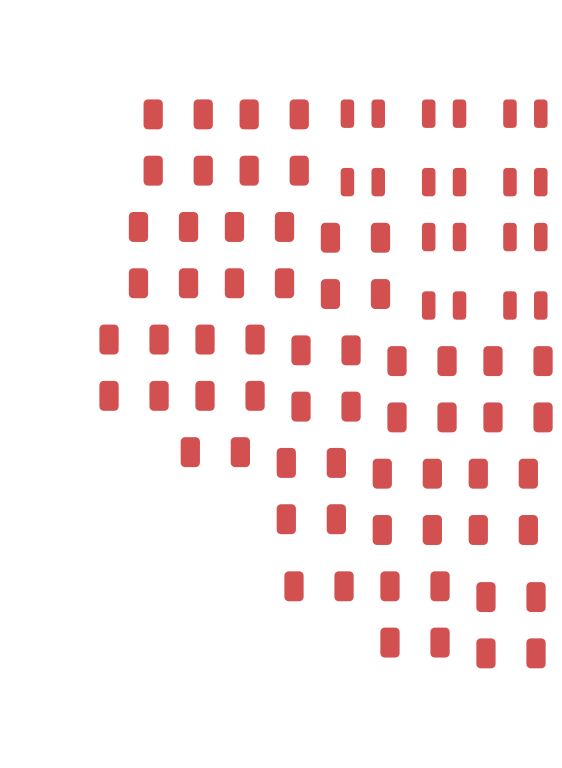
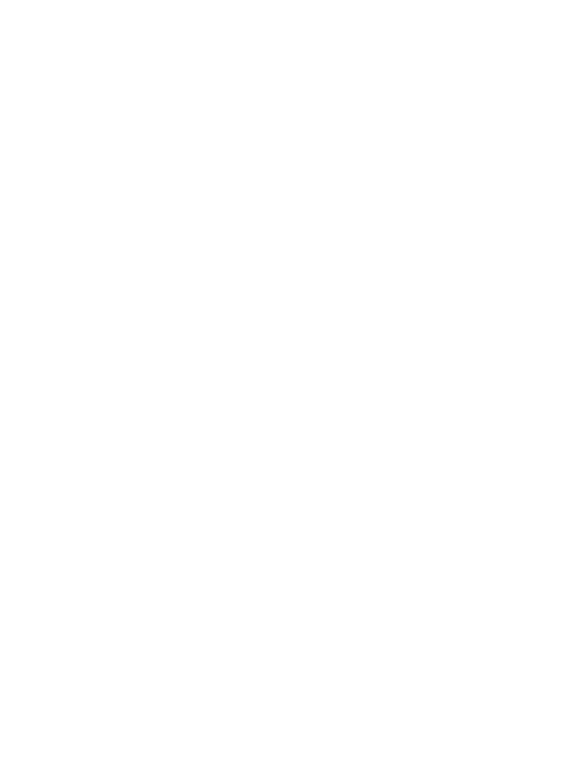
part: (178, 114) -> none
part: (274, 114) -> none
part: (362, 147) -> none
part: (444, 147) -> none
part: (525, 147) -> none
part: (178, 170) -> none
part: (274, 170) -> none
part: (163, 226) -> none
part: (259, 226) -> none
part: (355, 237) -> none
part: (444, 271) -> none
part: (525, 271) -> none
part: (163, 283) -> none
part: (259, 283) -> none
part: (355, 294) -> none
part: (134, 339) -> none
part: (230, 339) -> none
part: (326, 350) -> none
part: (422, 361) -> none
part: (518, 361) -> none
part: (134, 395) -> none
part: (230, 395) -> none
part: (326, 406) -> none
part: (422, 417) -> none
part: (518, 417) -> none
part: (215, 452) -> none
part: (311, 462) -> none
part: (407, 473) -> none
part: (503, 473) -> none
part: (311, 519) -> none
part: (407, 529) -> none
part: (503, 529) -> none
part: (319, 586) -> none
part: (415, 586) -> none
part: (510, 597) -> none
part: (415, 642) -> none
part: (510, 653) -> none

